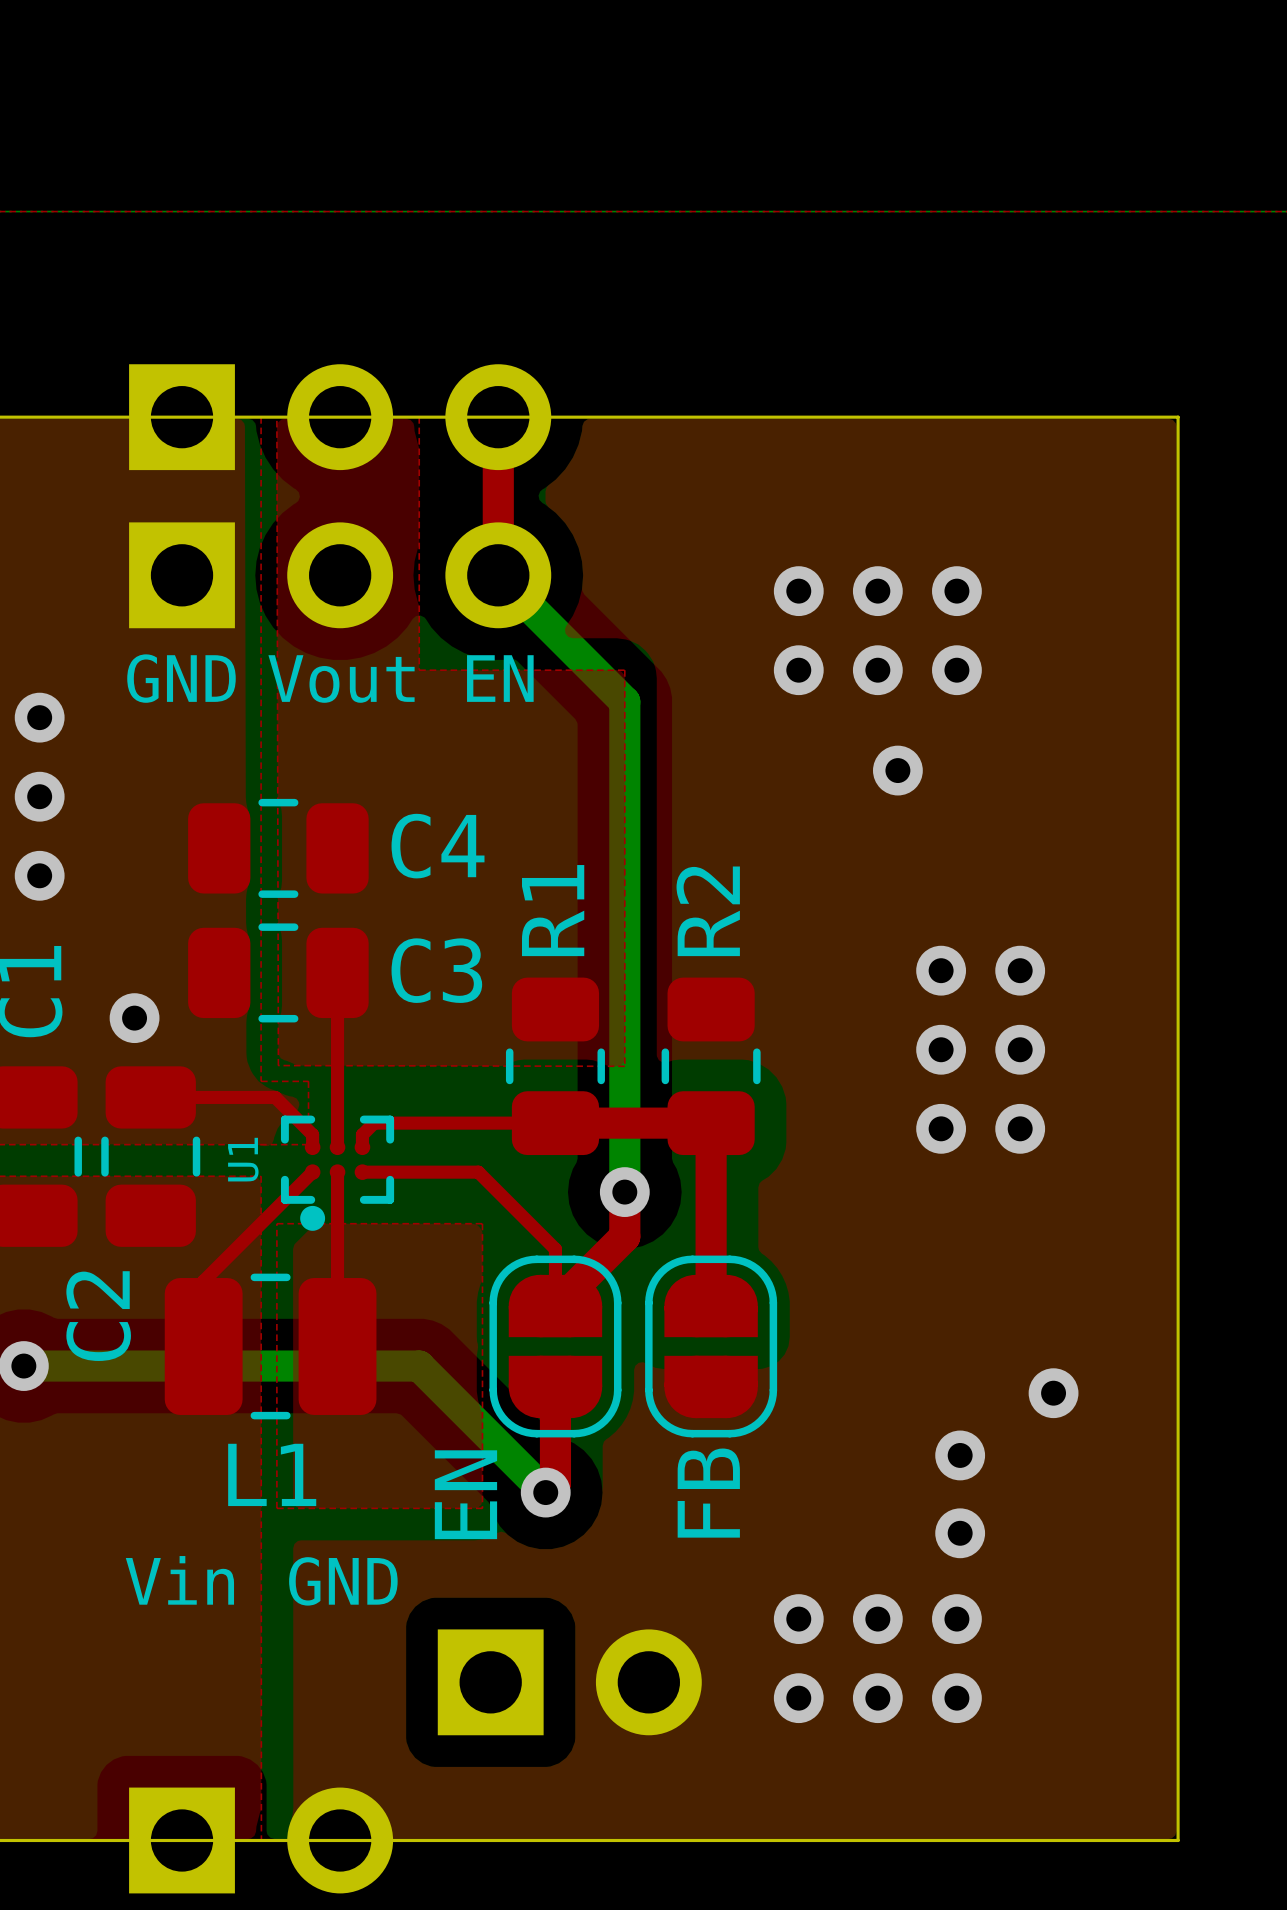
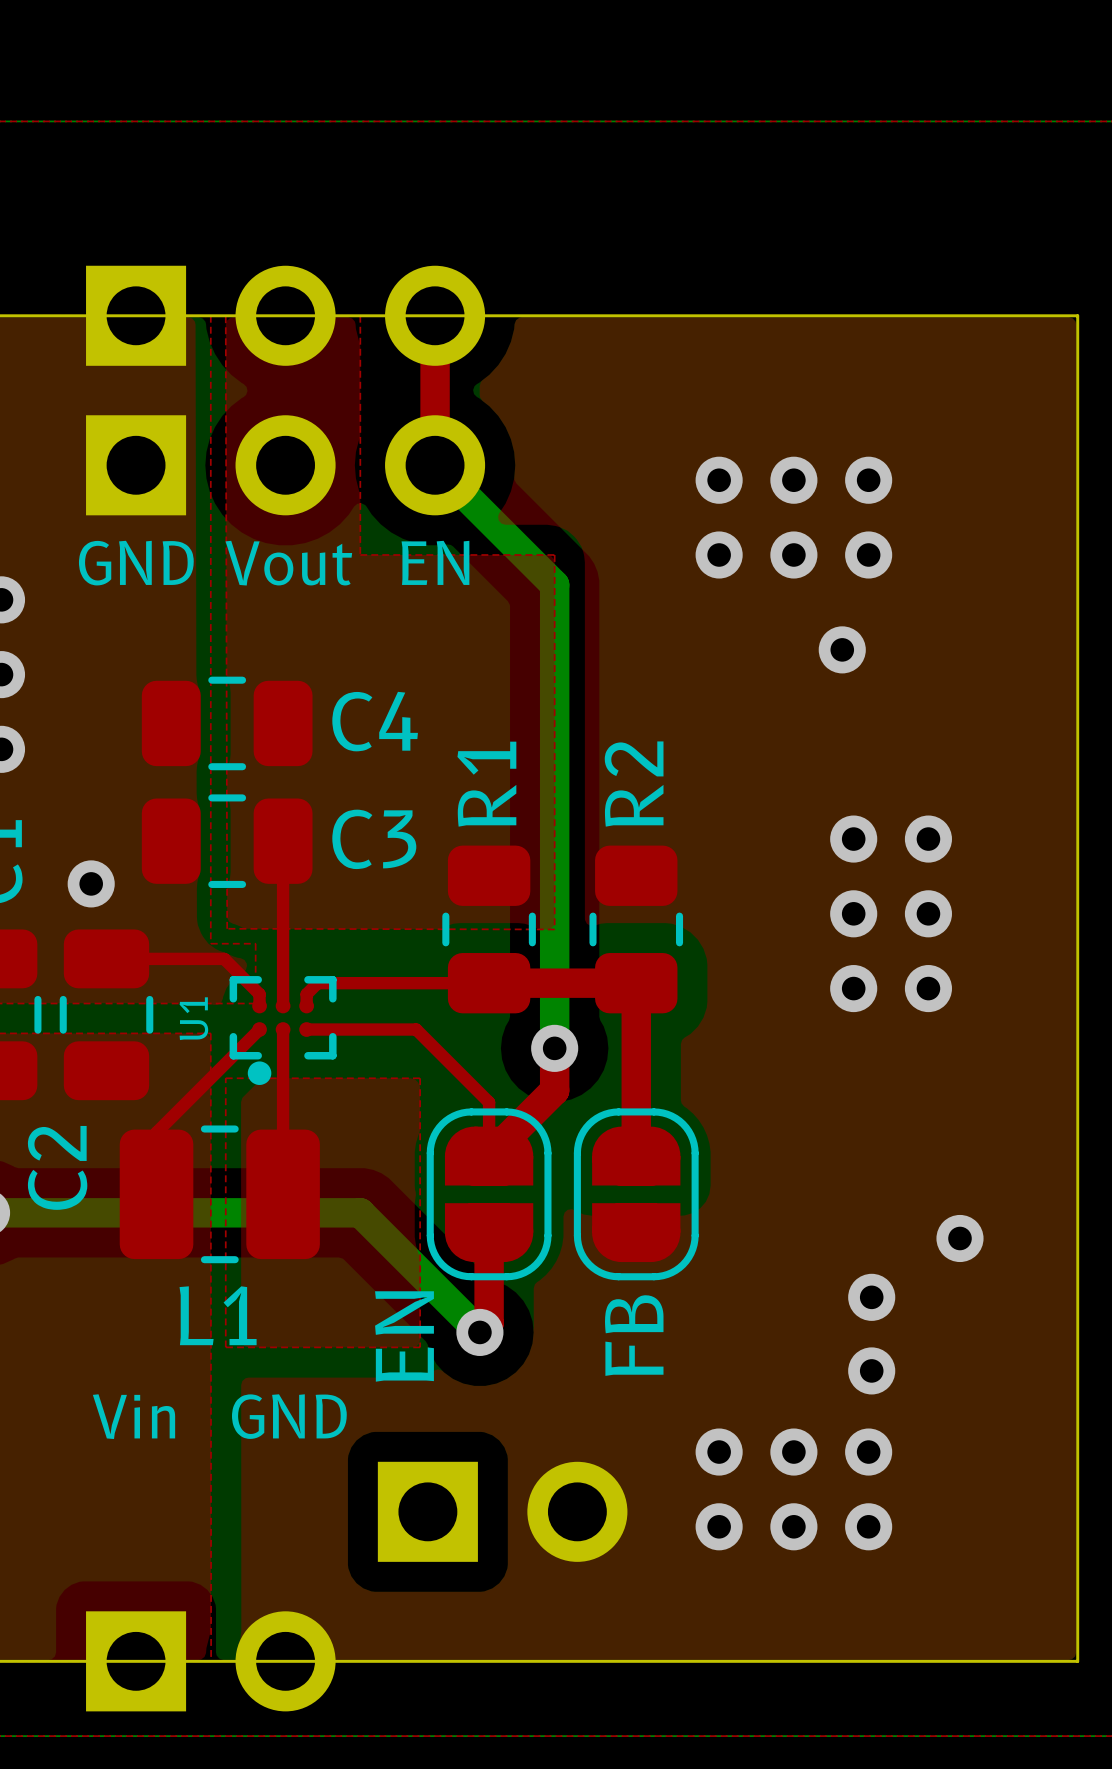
via position: (897, 770) -> (842, 649)

